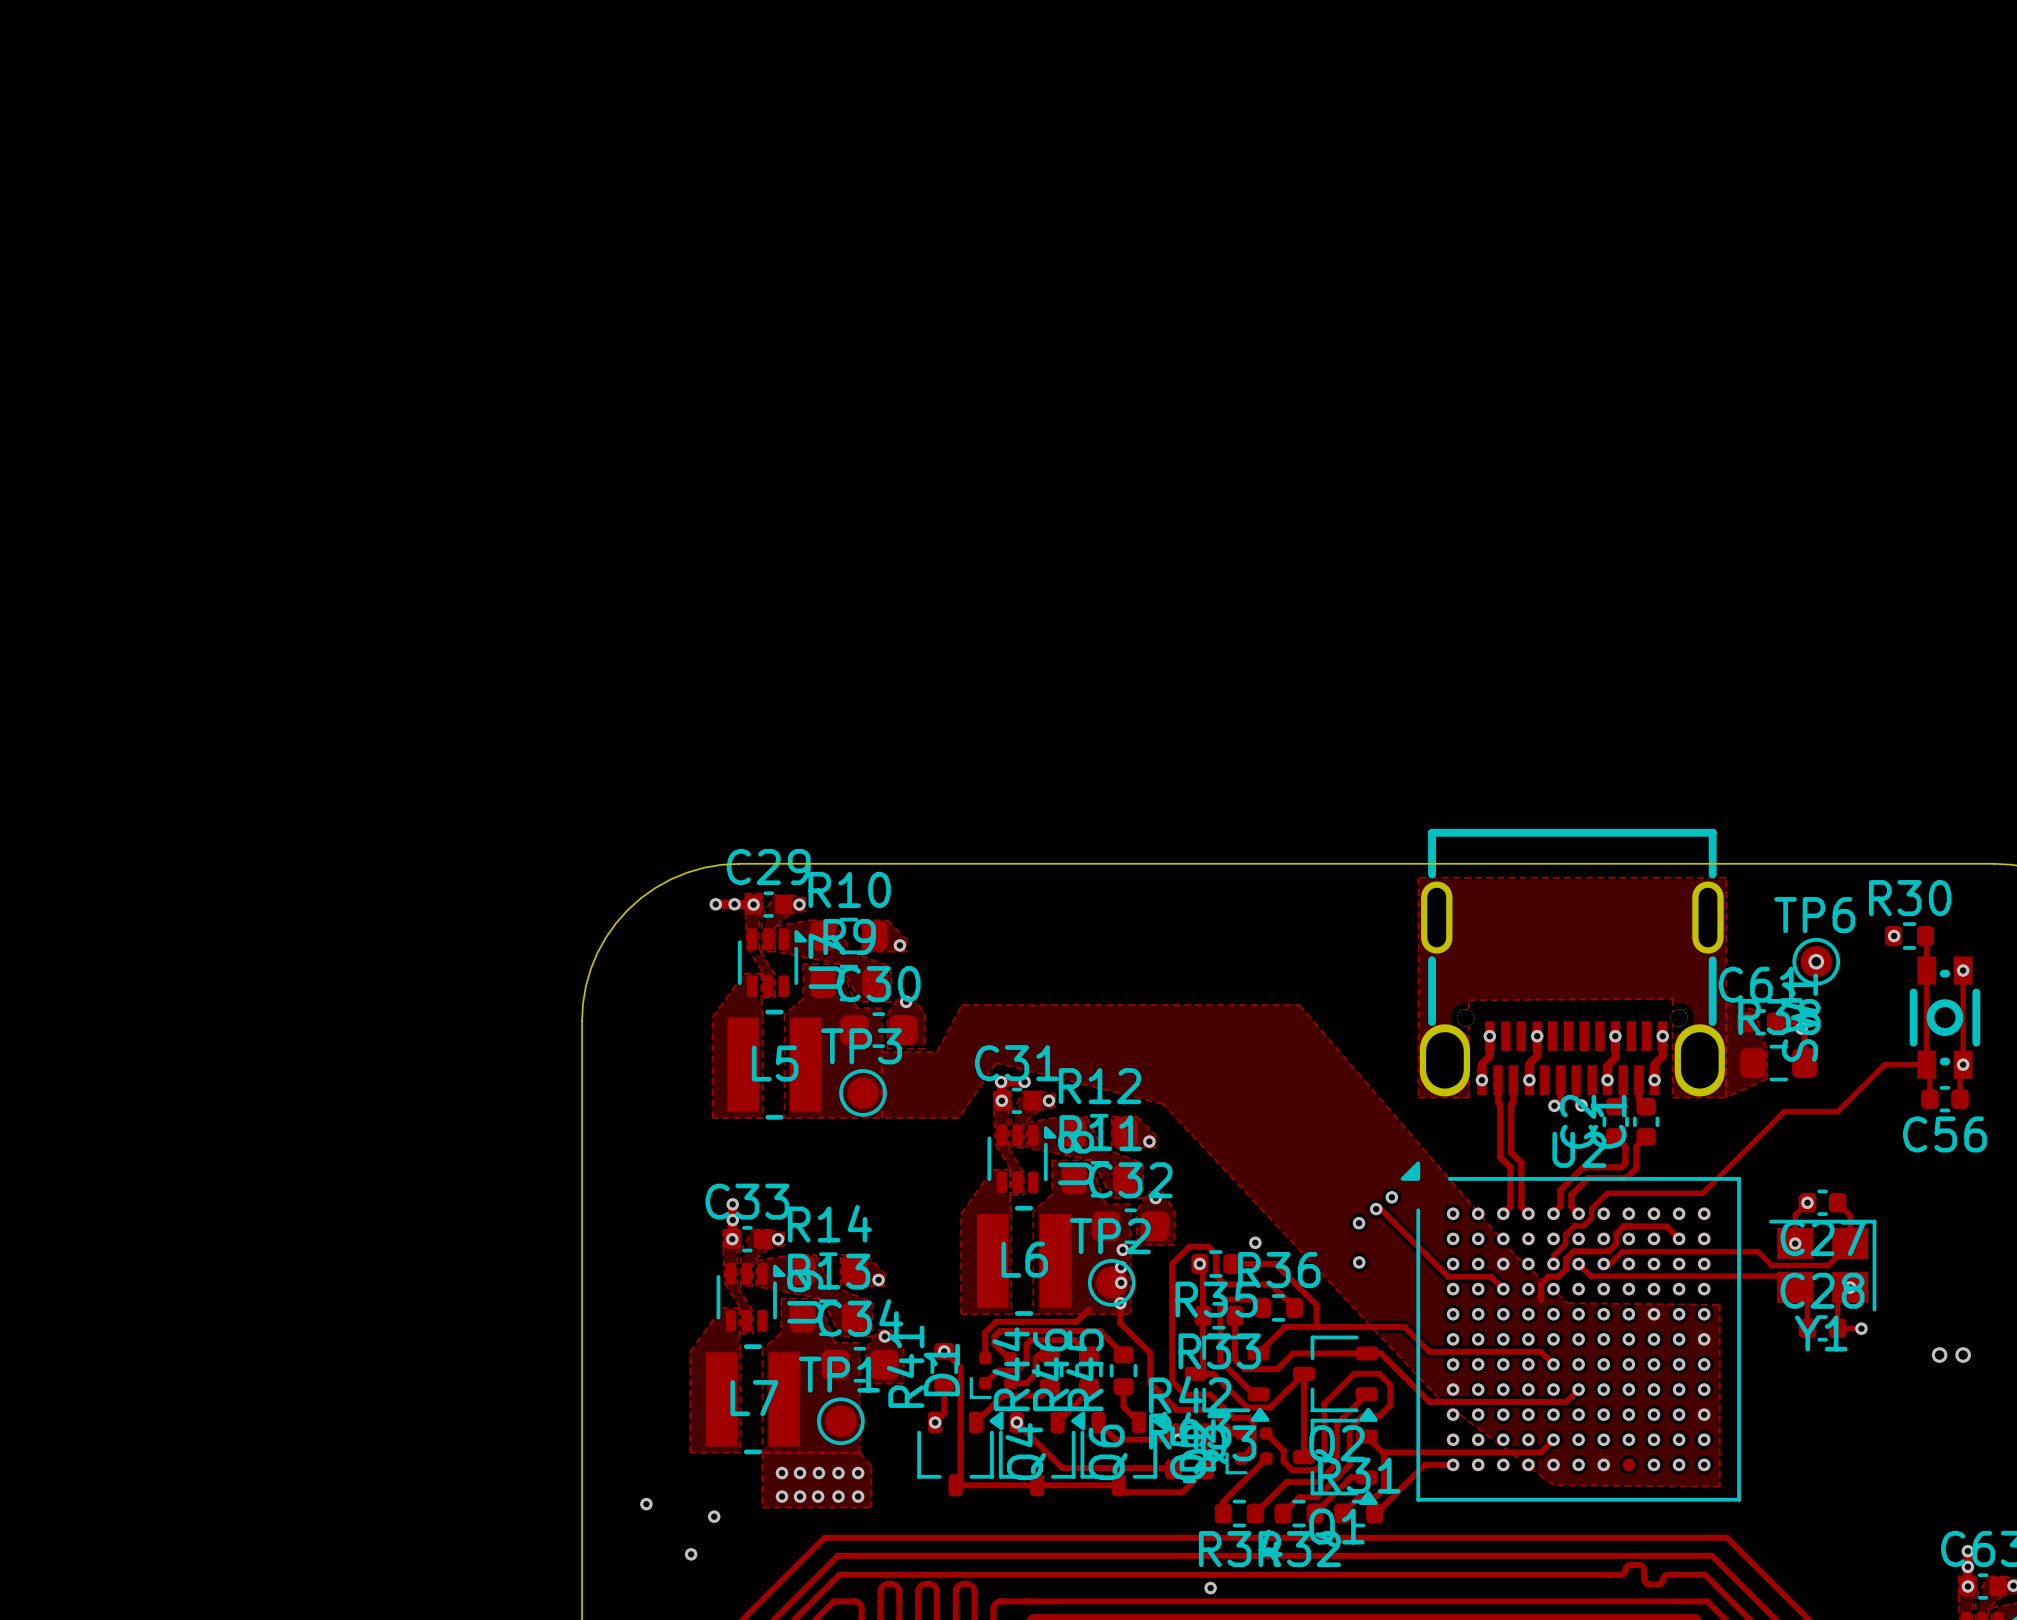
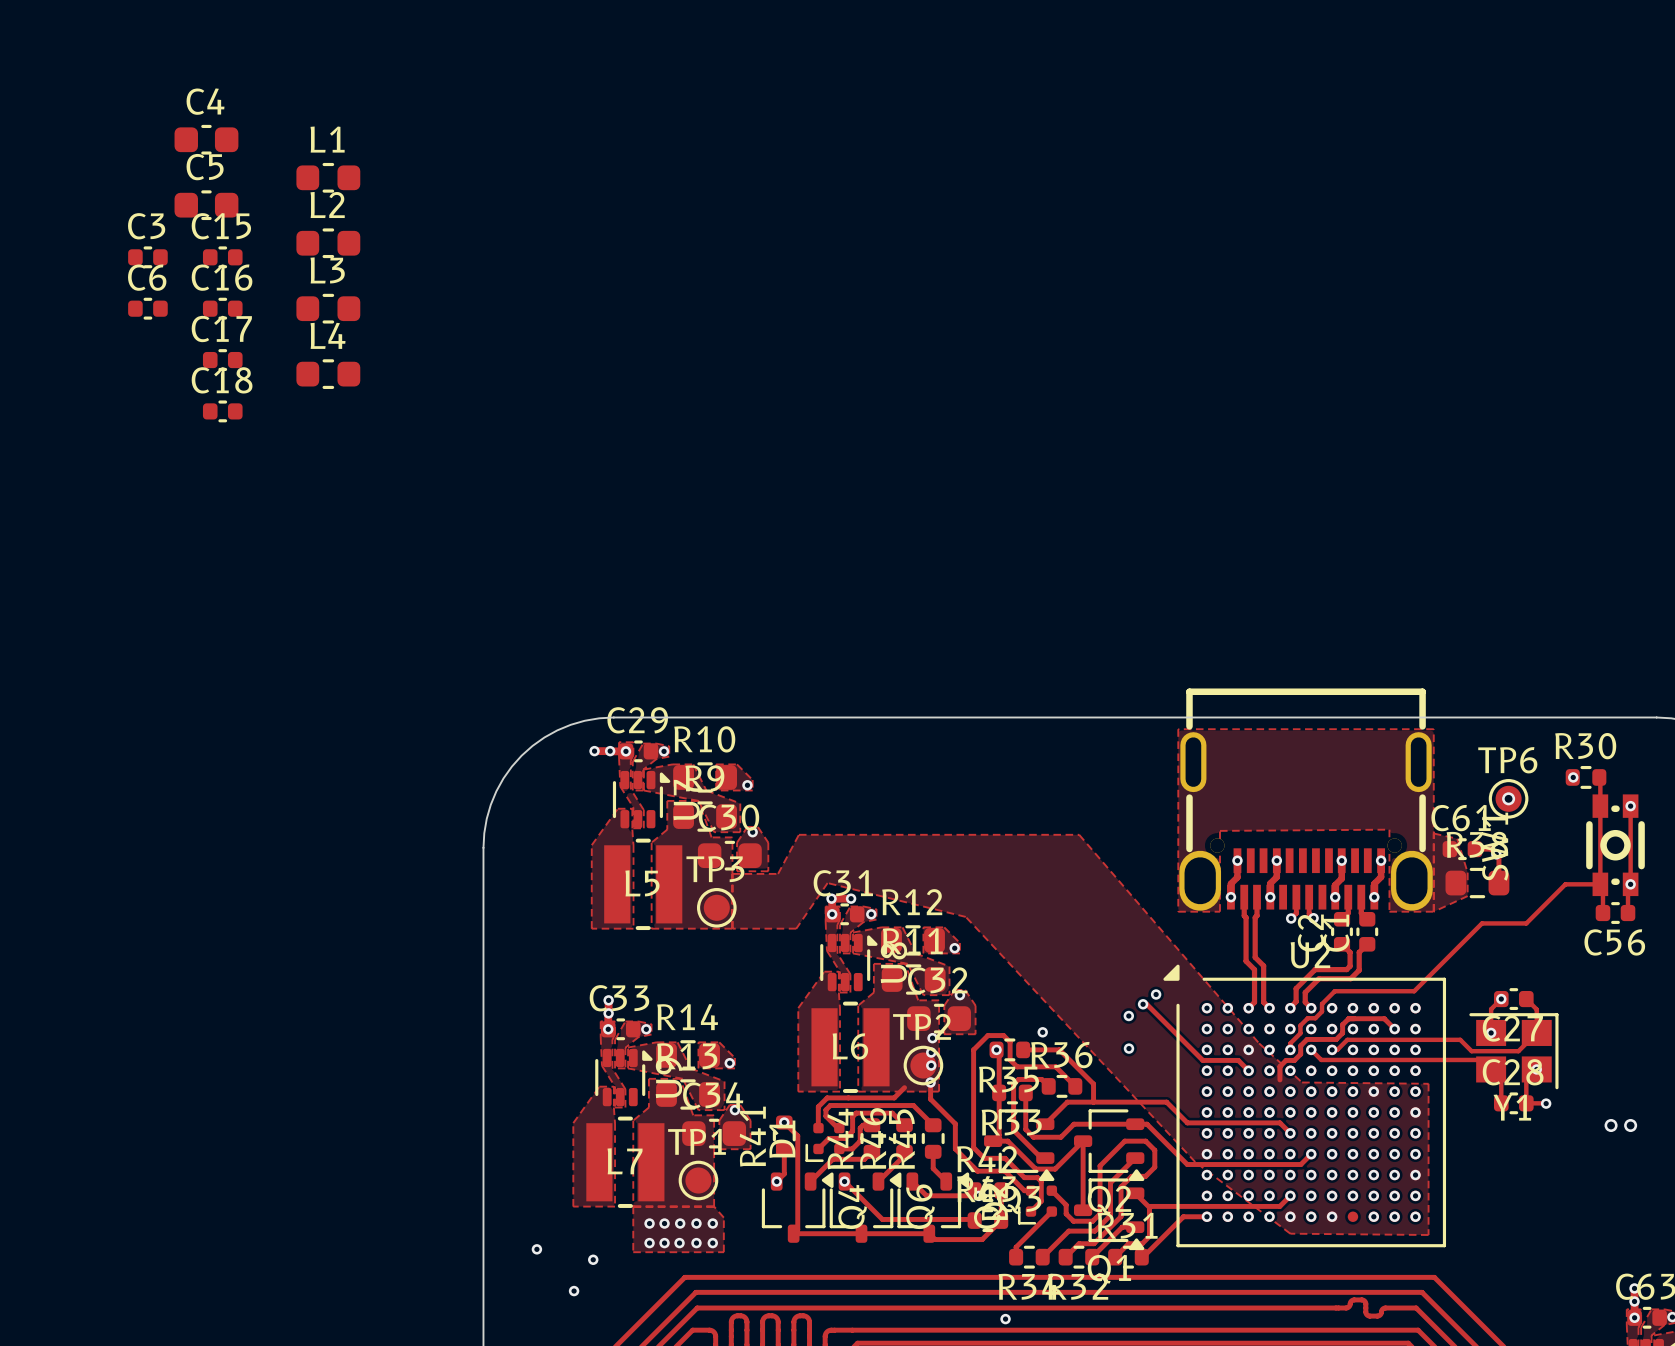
C4: none -> (206, 139)
L1: none -> (328, 177)
C5: none -> (206, 205)
L2: none -> (328, 243)
C3: none -> (147, 257)
C15: none -> (222, 257)
C6: none -> (147, 308)
C16: none -> (222, 308)
L3: none -> (328, 308)
C17: none -> (222, 360)
L4: none -> (328, 374)
C18: none -> (222, 411)

